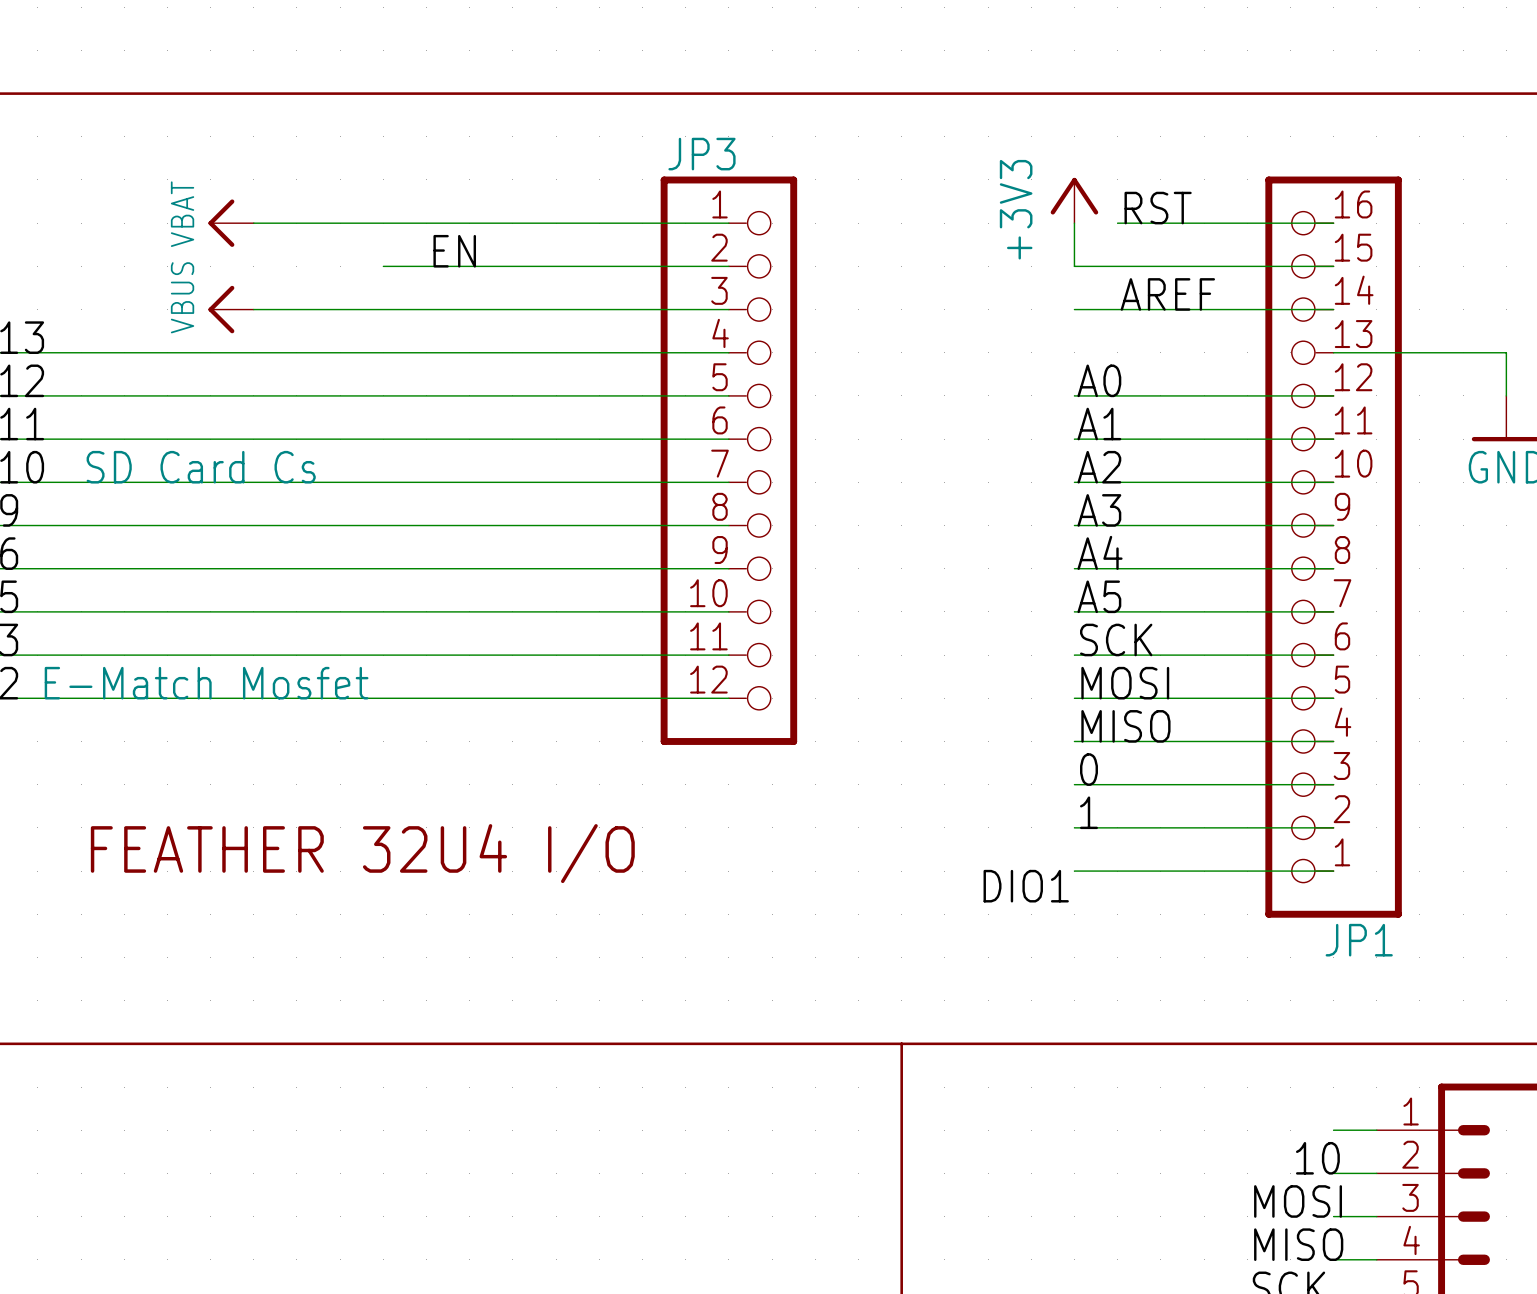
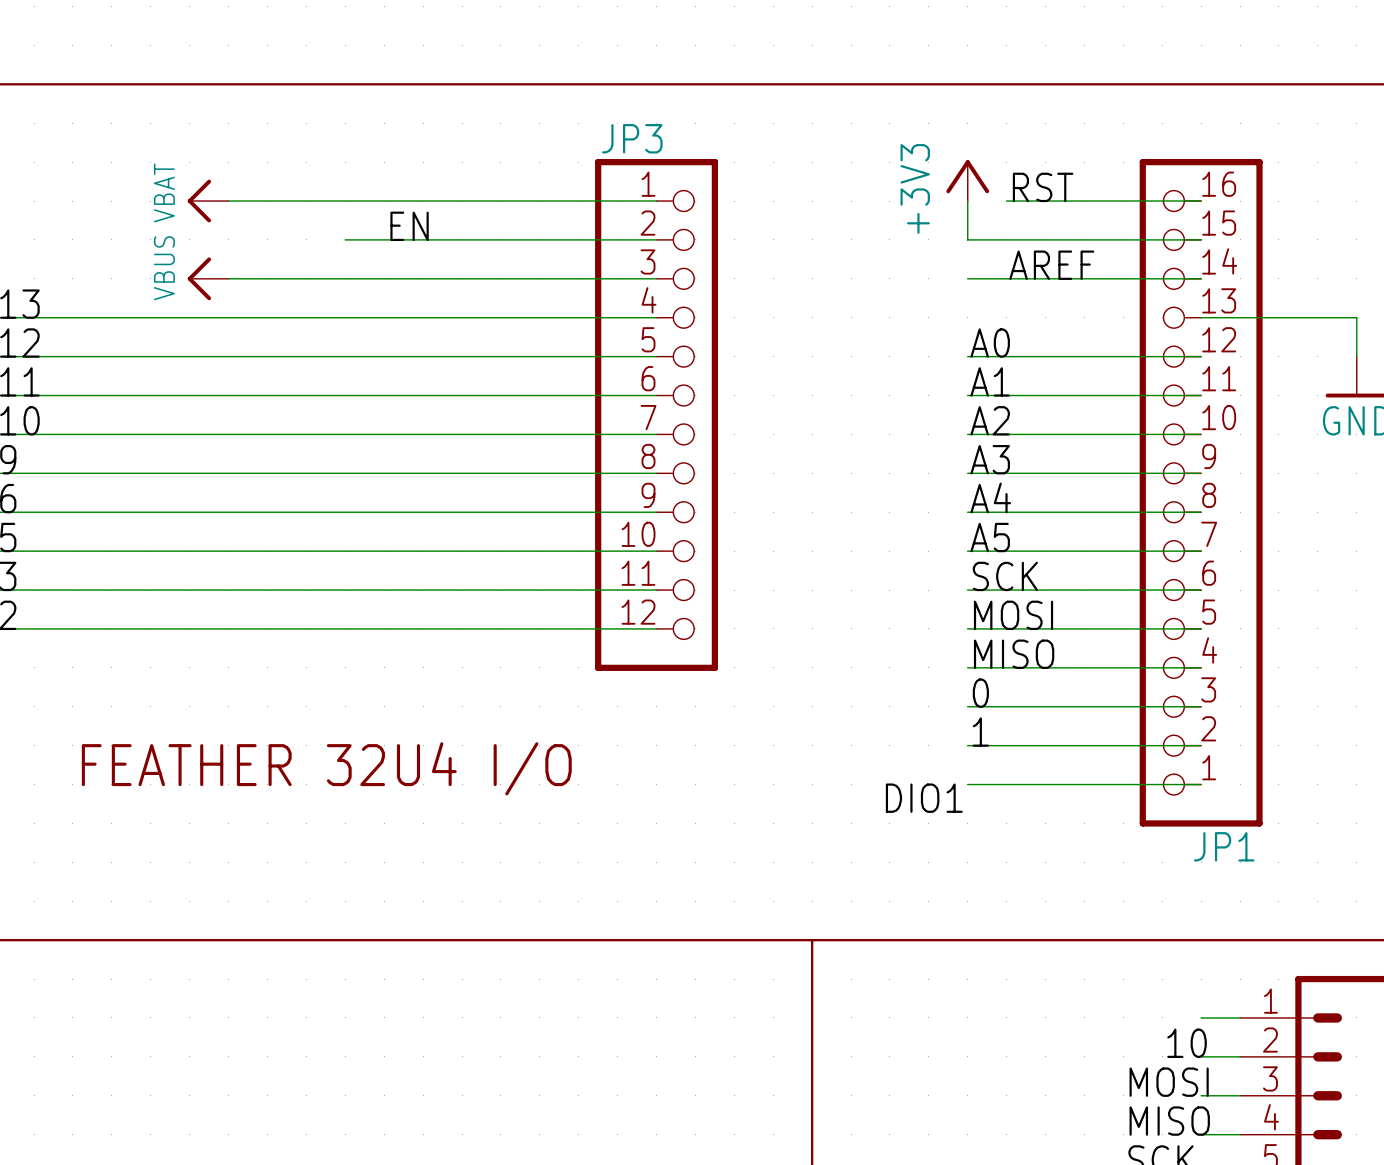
text: SD Card Cs (201, 467) -> none
text: E-Match Mosfet (206, 683) -> none

